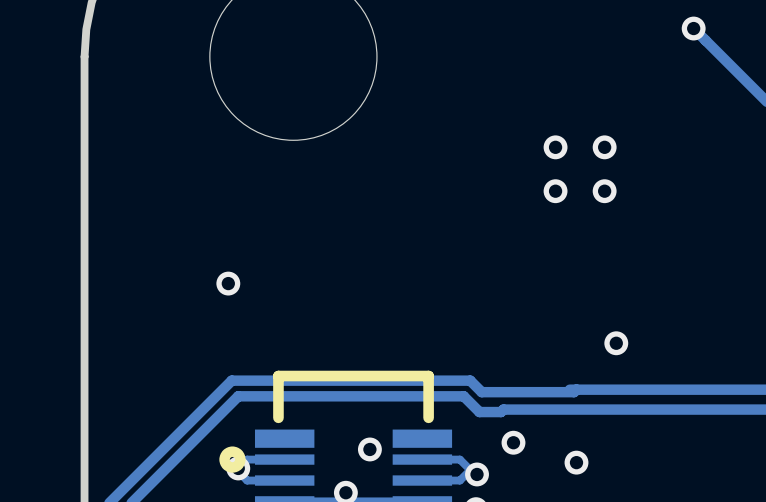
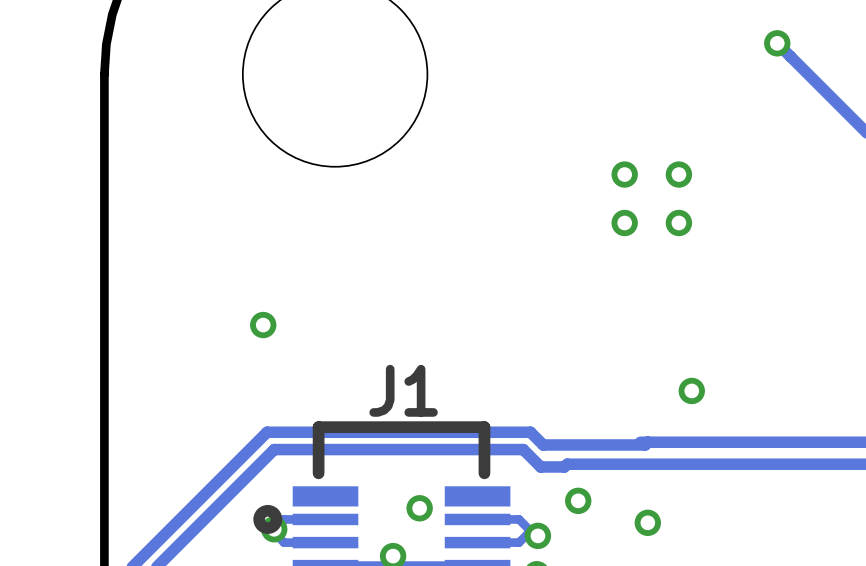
J1 name: none -> J1 (403, 390)

